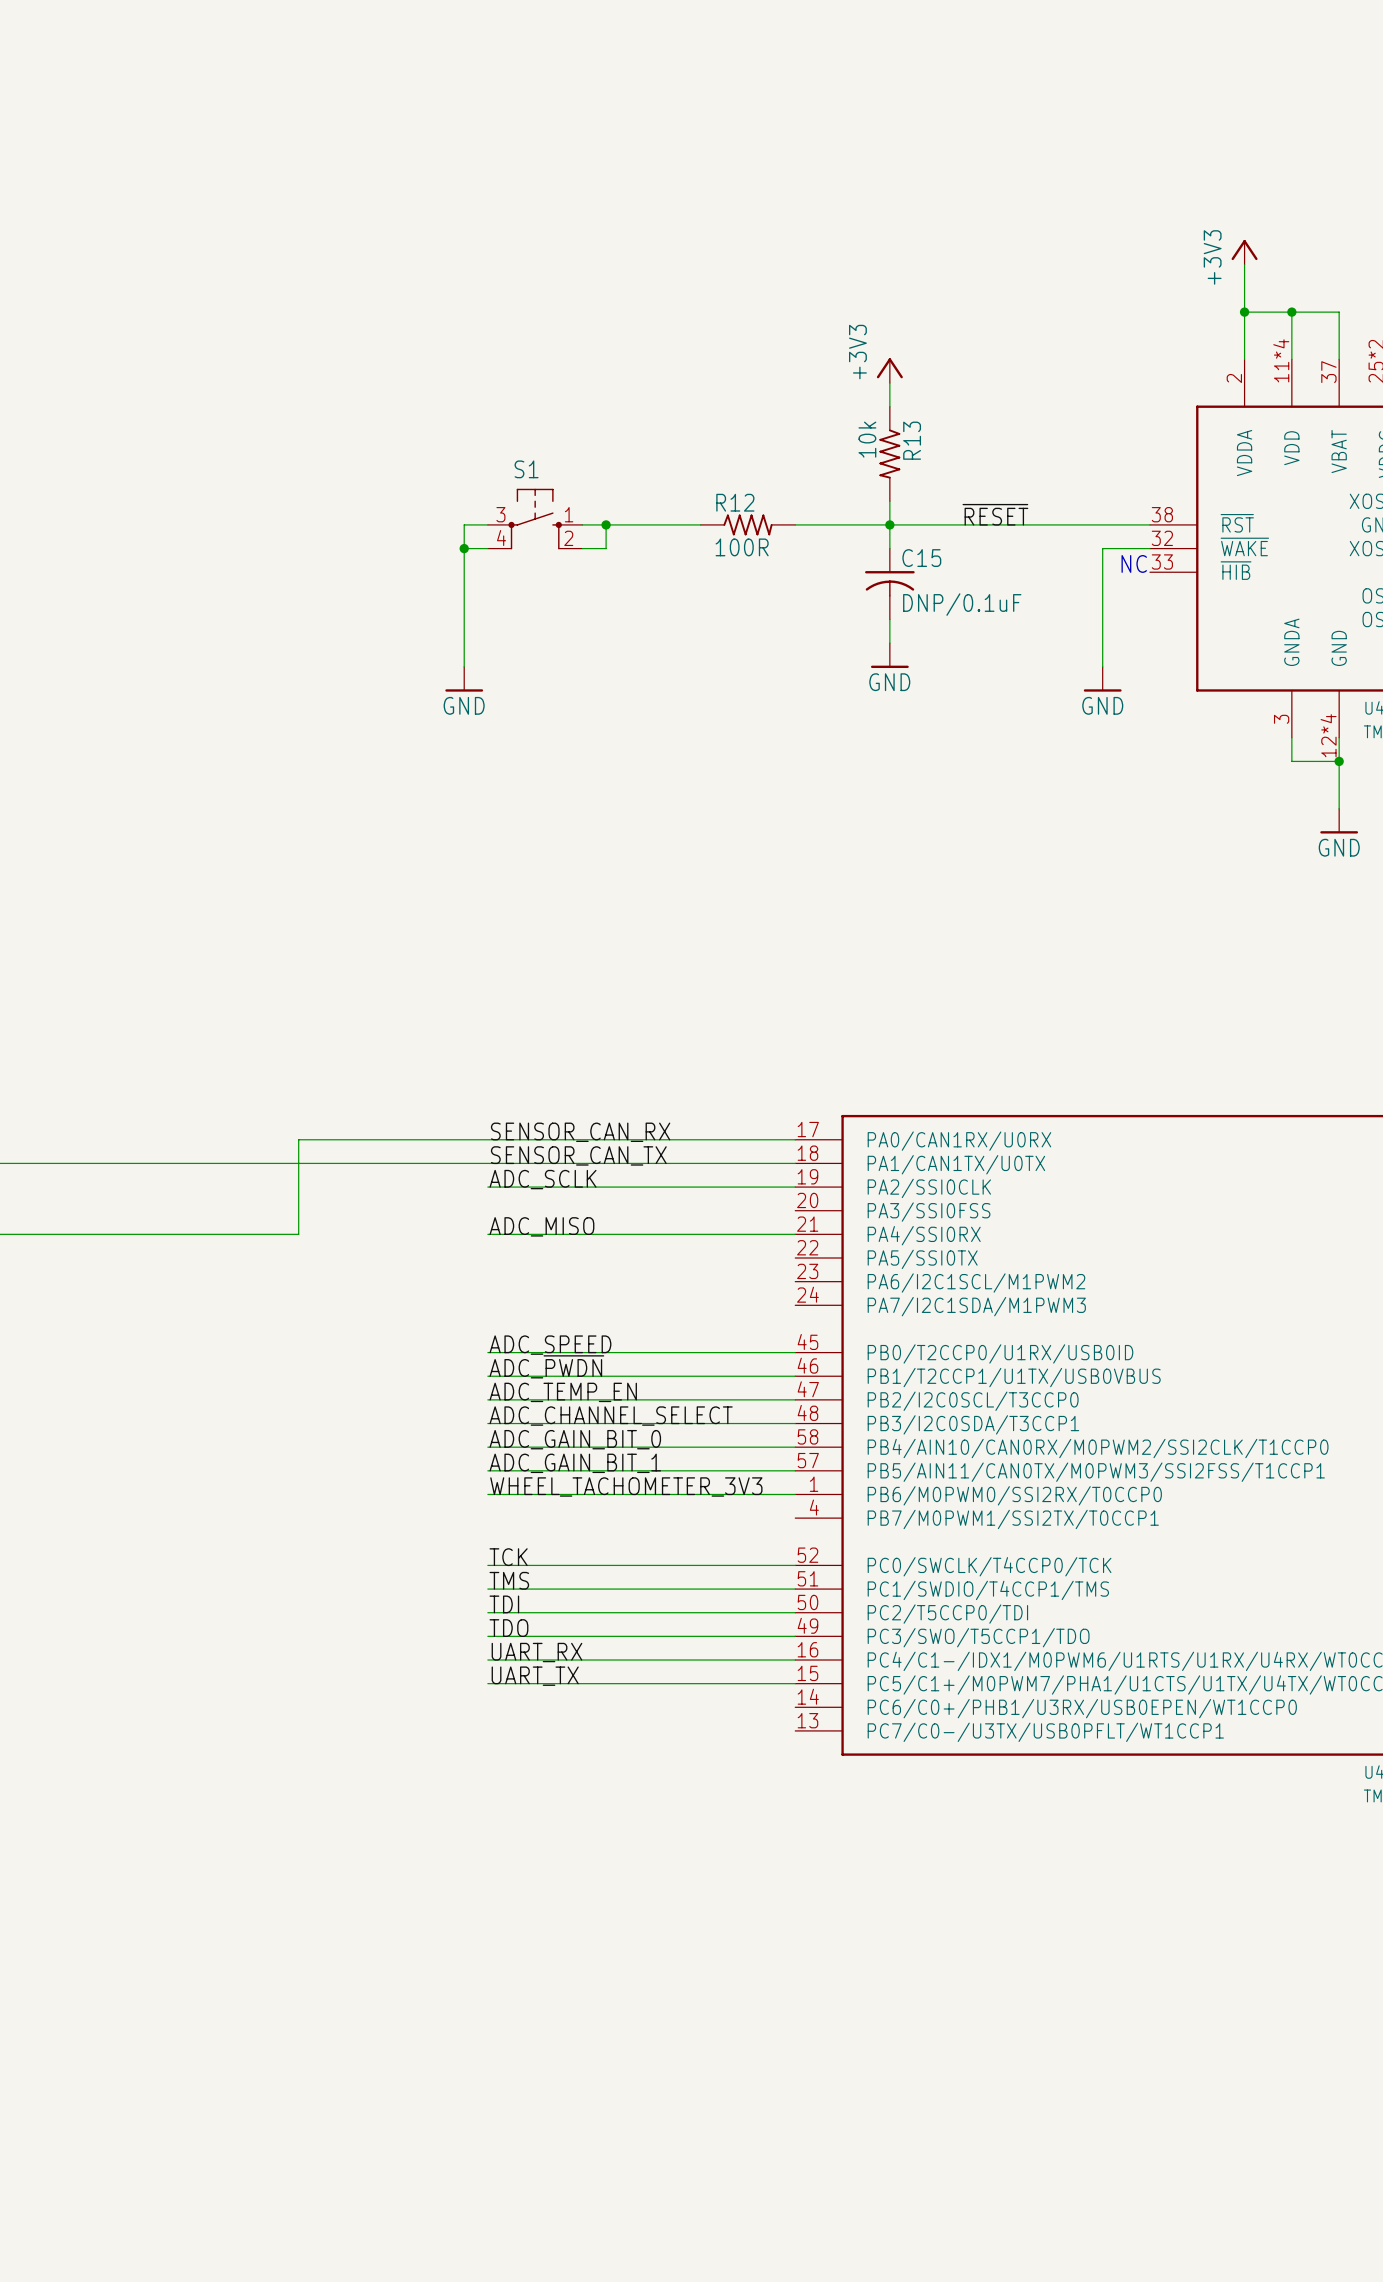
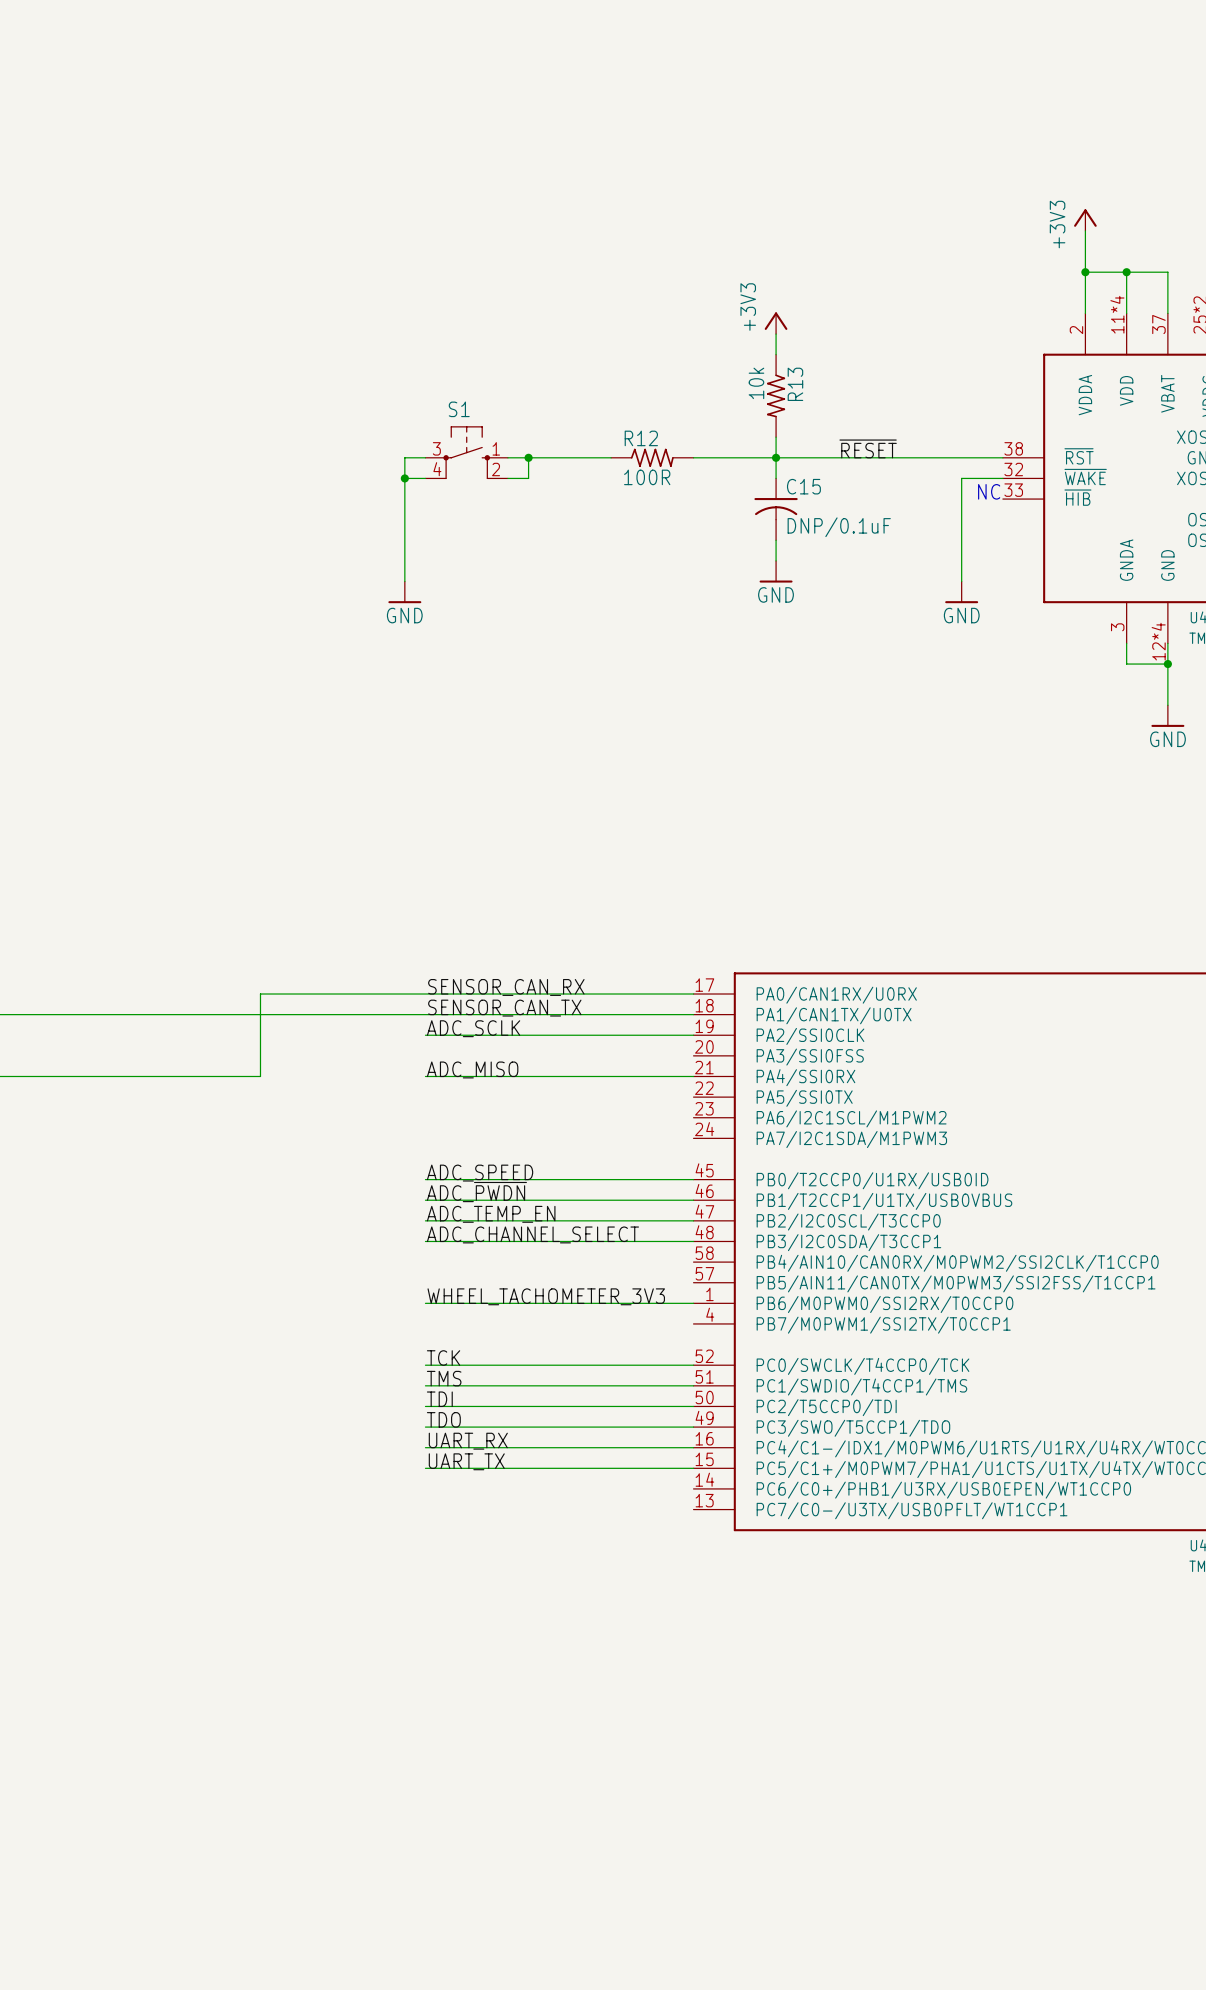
label: ADC_GAIN_BIT_0 (575, 1439) -> none
wire: (487, 1447) (795, 1447) -> none
label: ADC_GAIN_BIT_1 (575, 1463) -> none
wire: (487, 1470) (795, 1470) -> none

